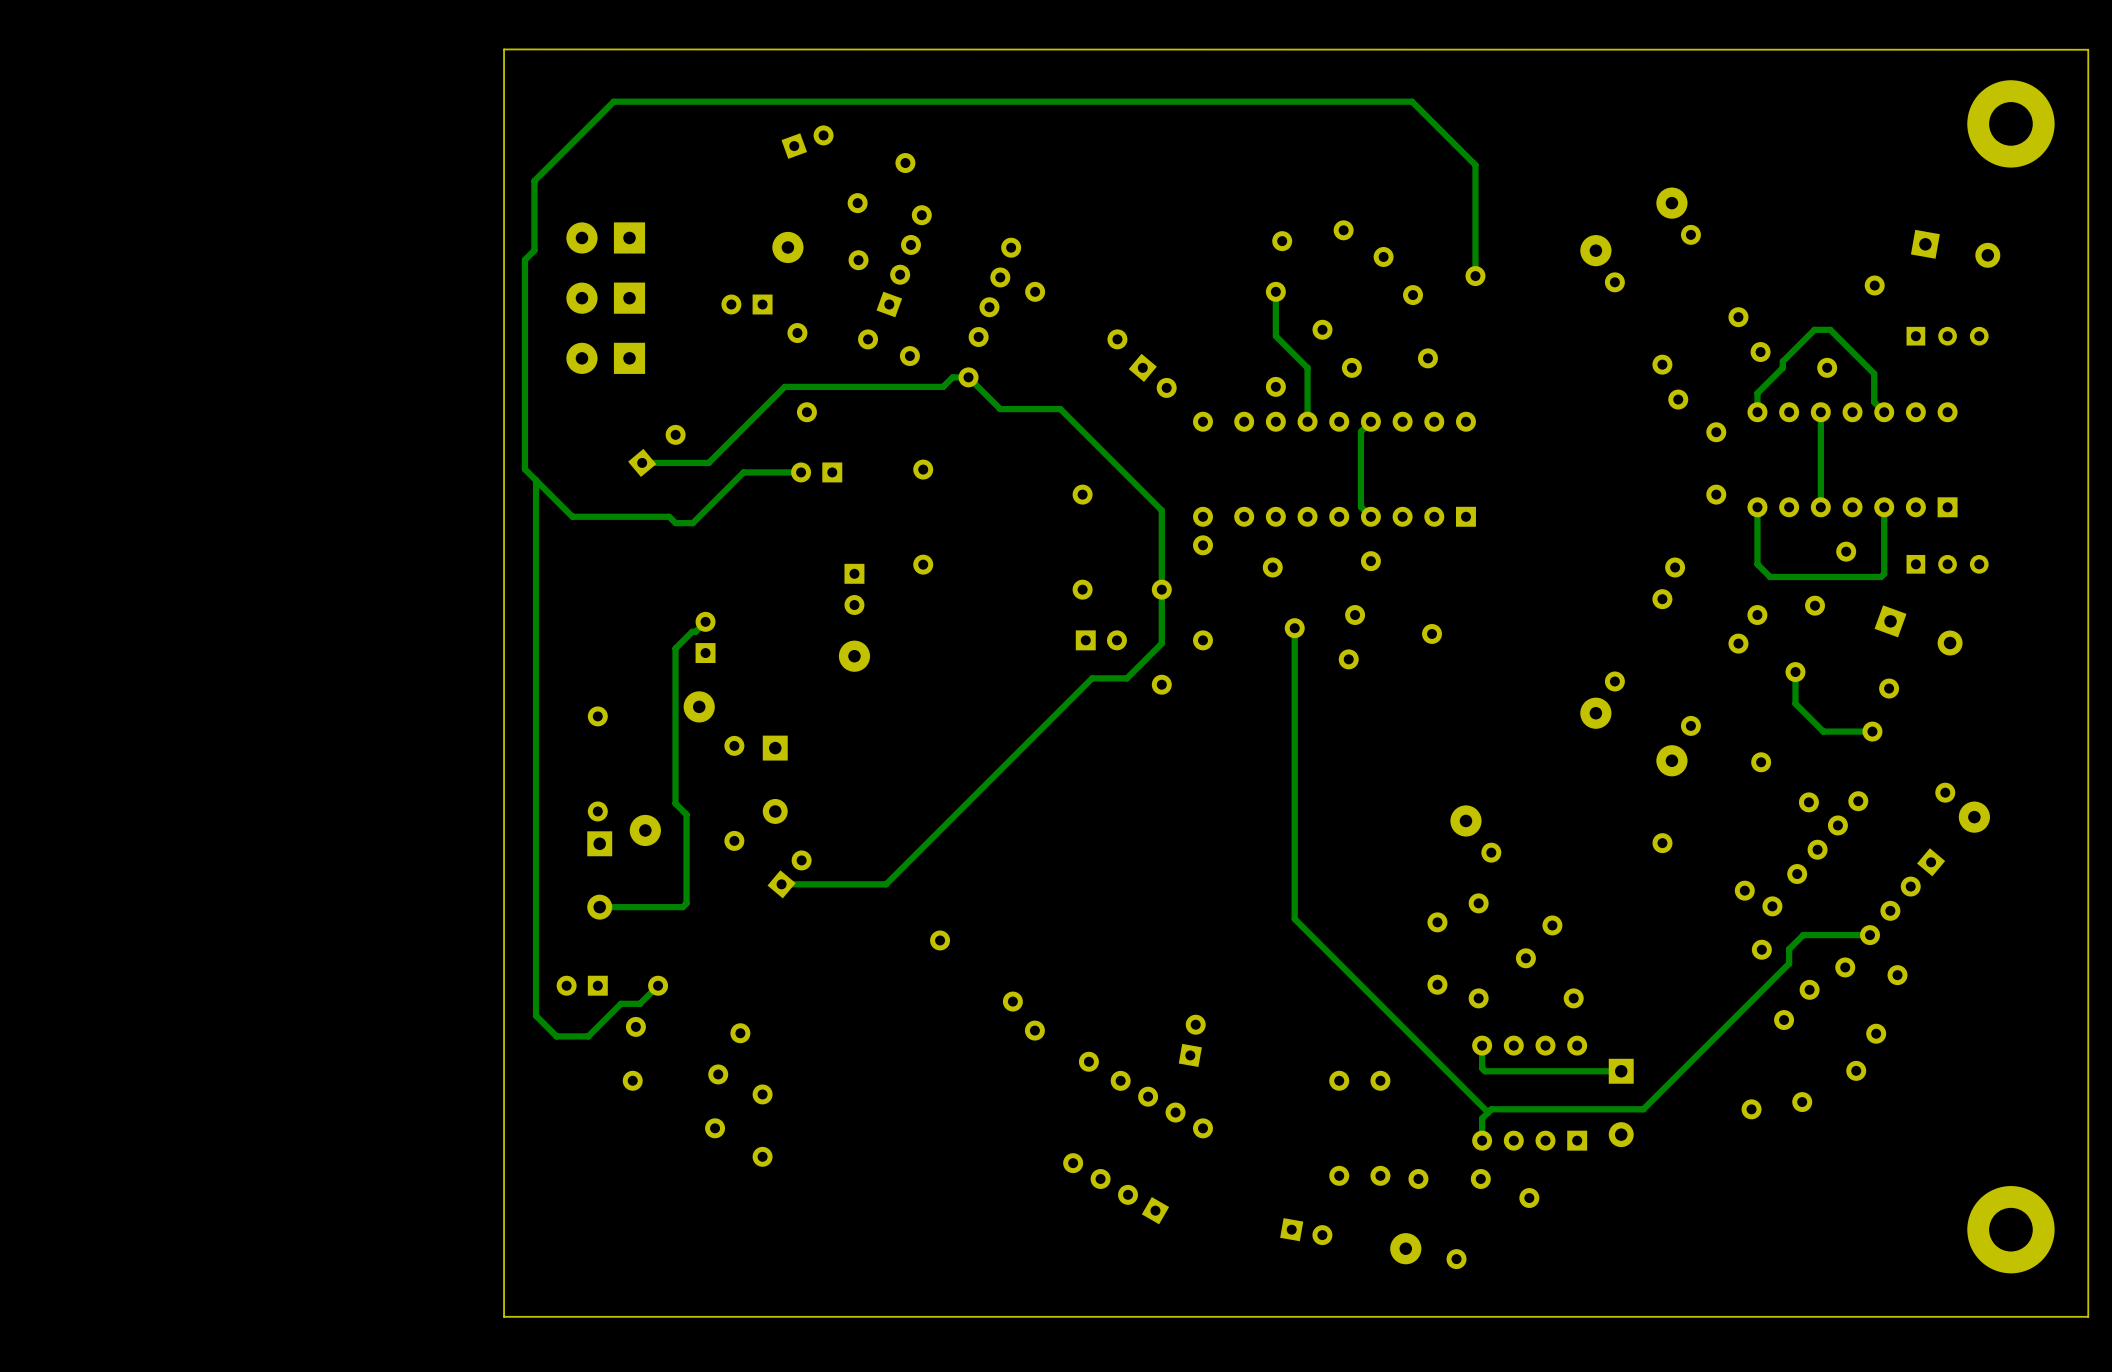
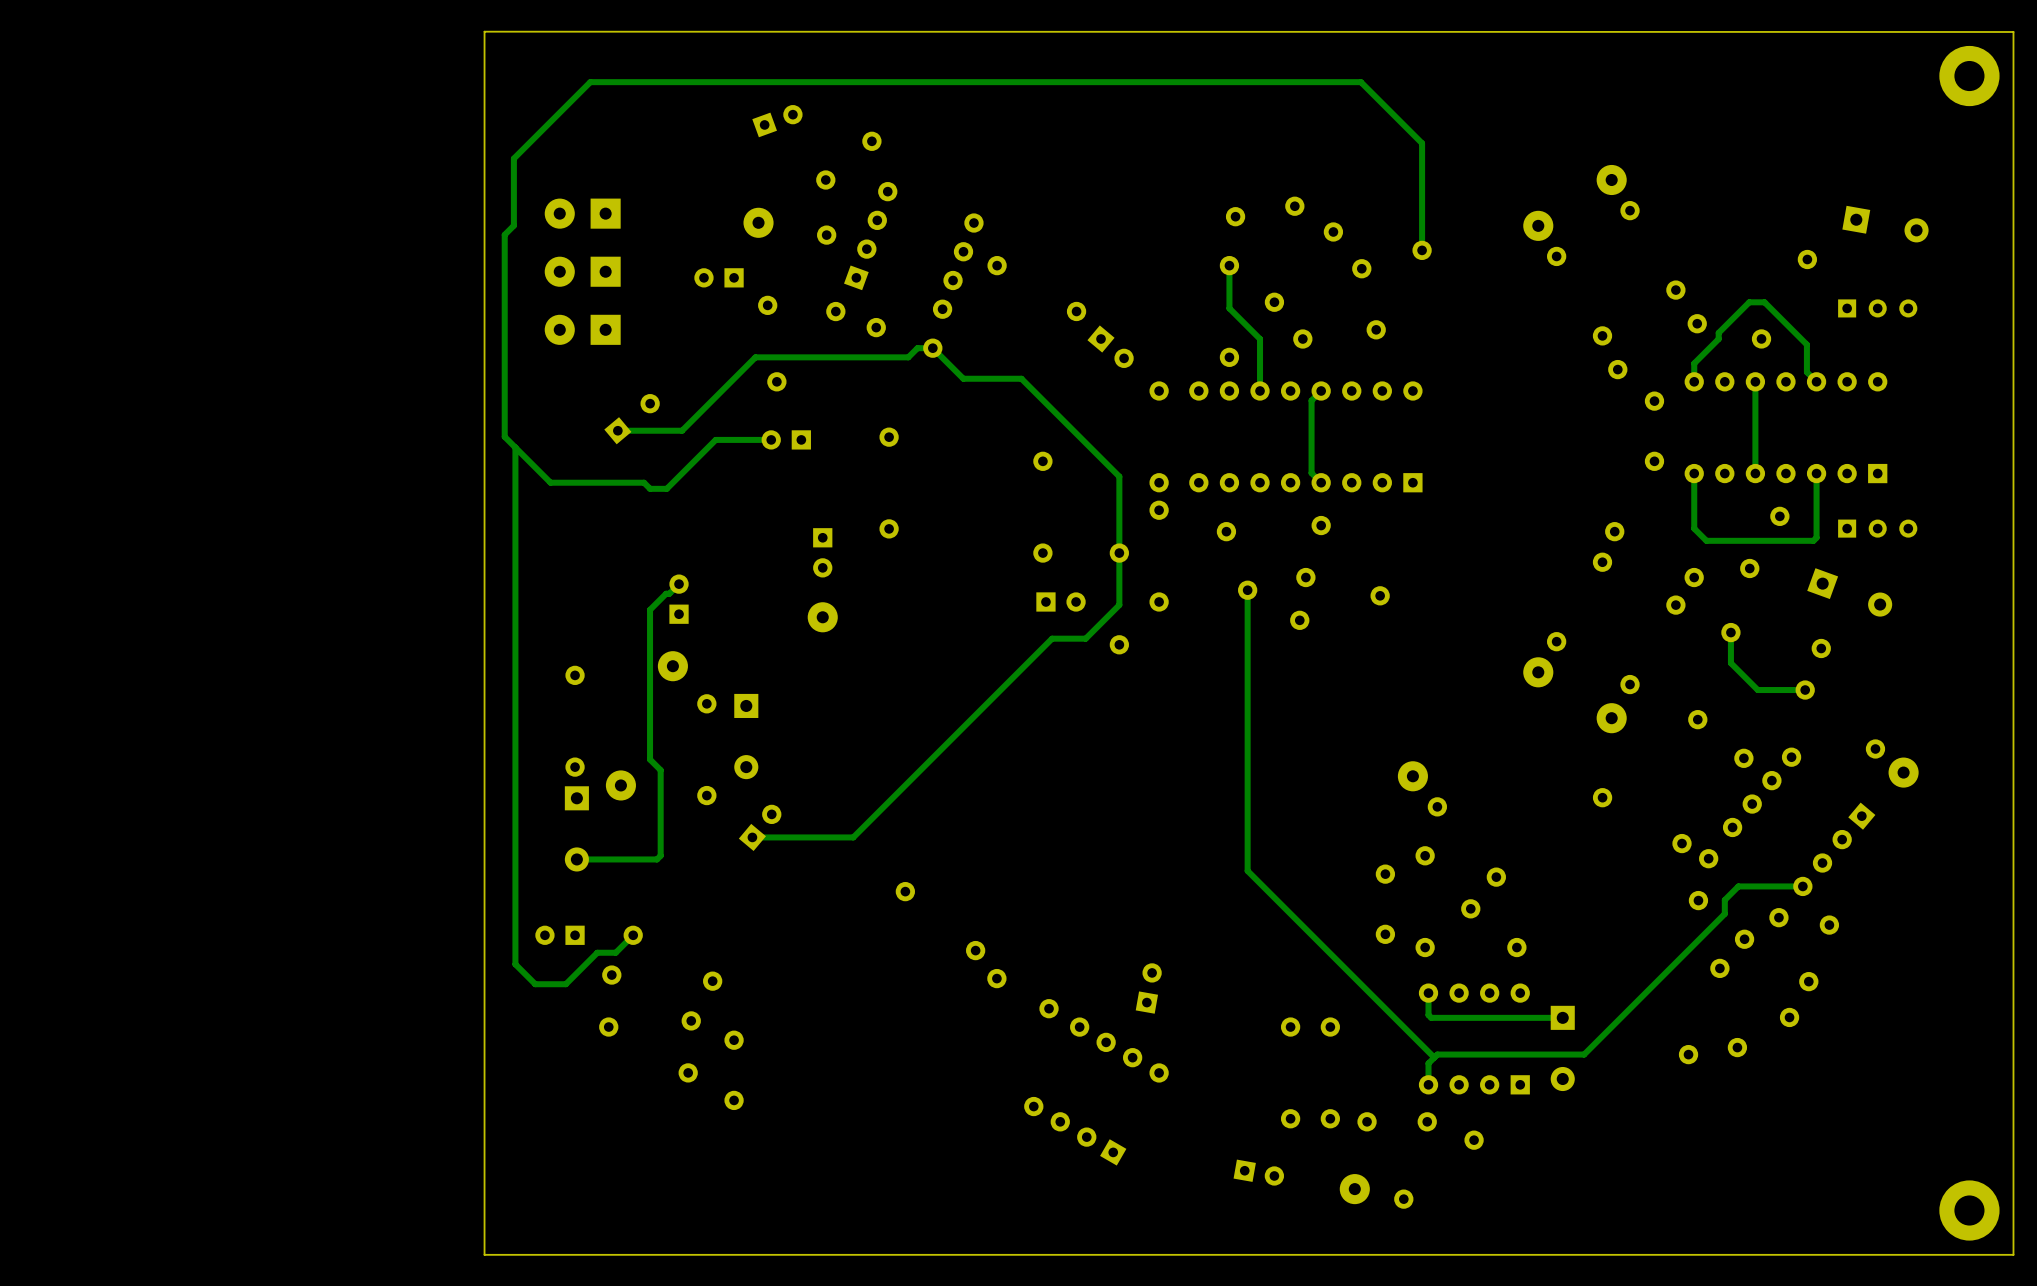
part: none -> (1969, 76)
part: (2010, 123) -> none
part: (2010, 1229) -> none
part: none -> (1969, 1210)

